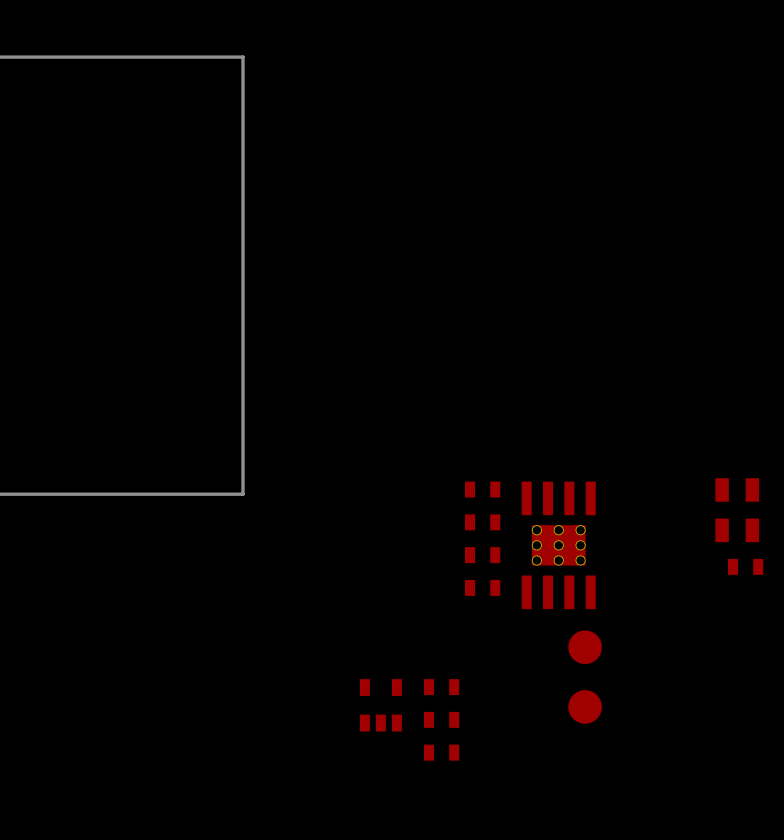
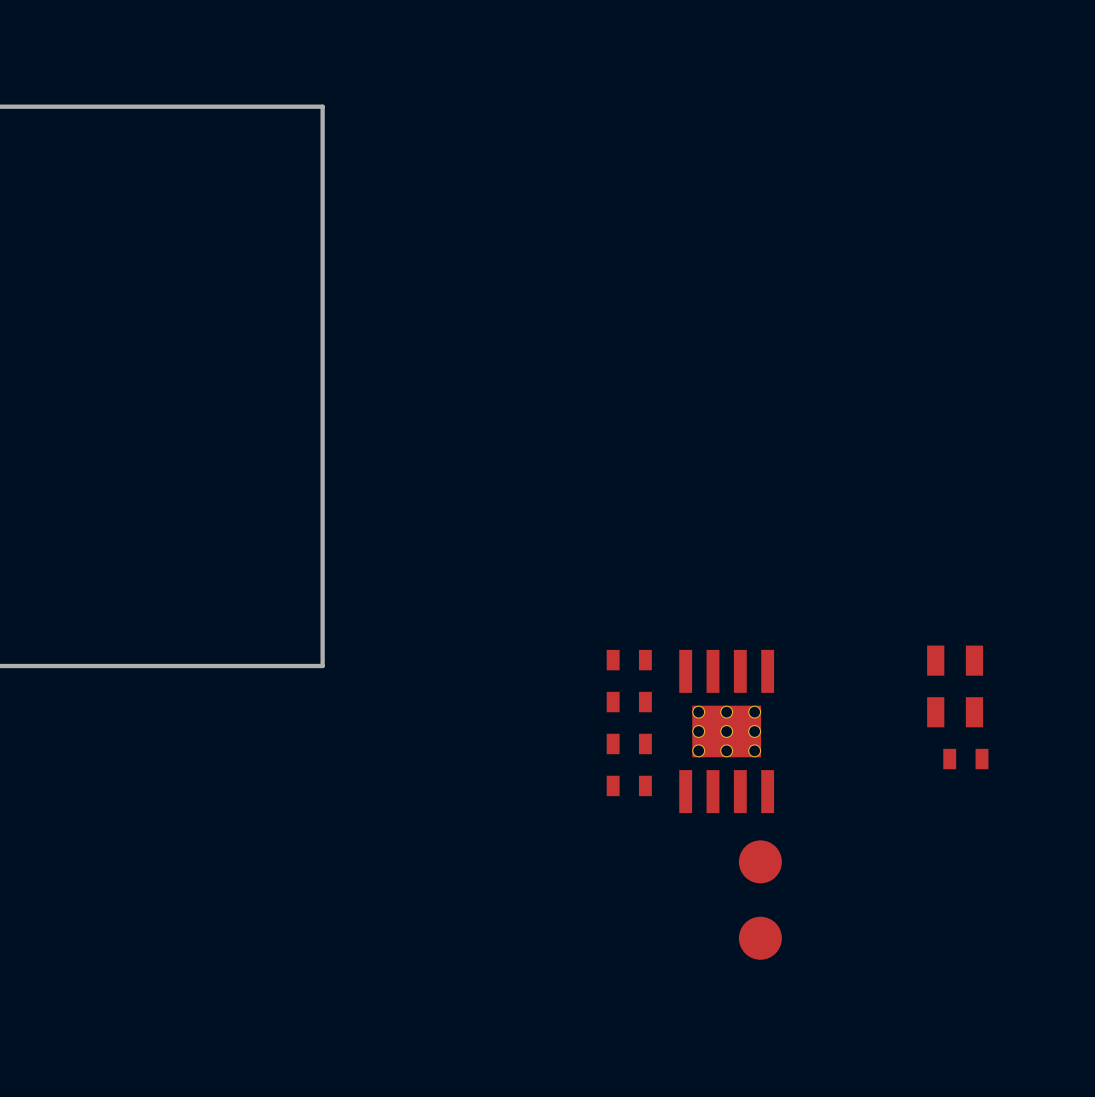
part: (441, 687) -> none
part: (380, 705) -> none
part: (441, 719) -> none
part: (441, 752) -> none

